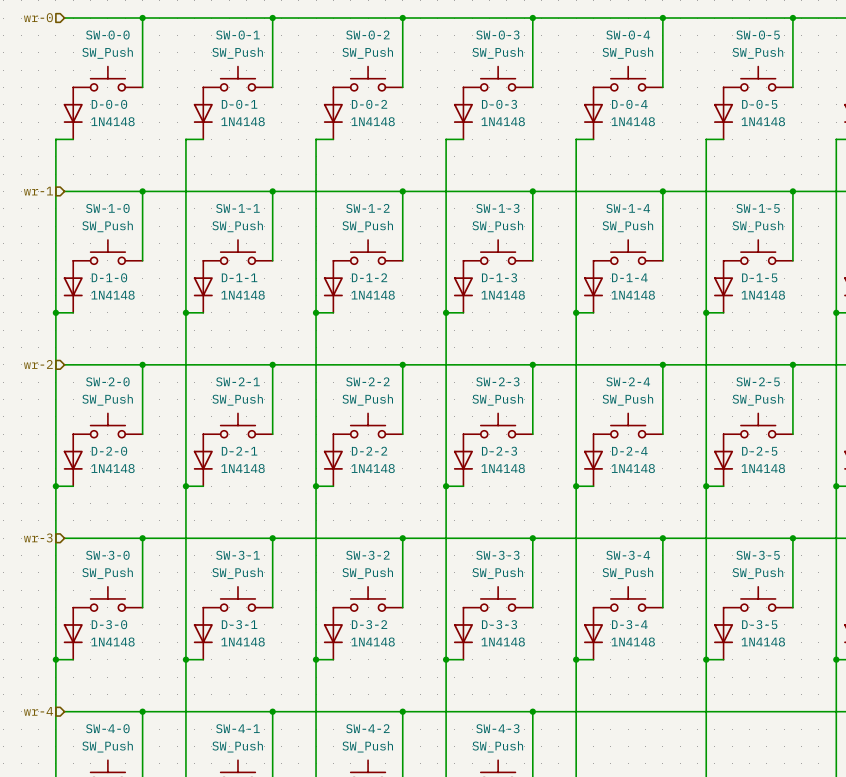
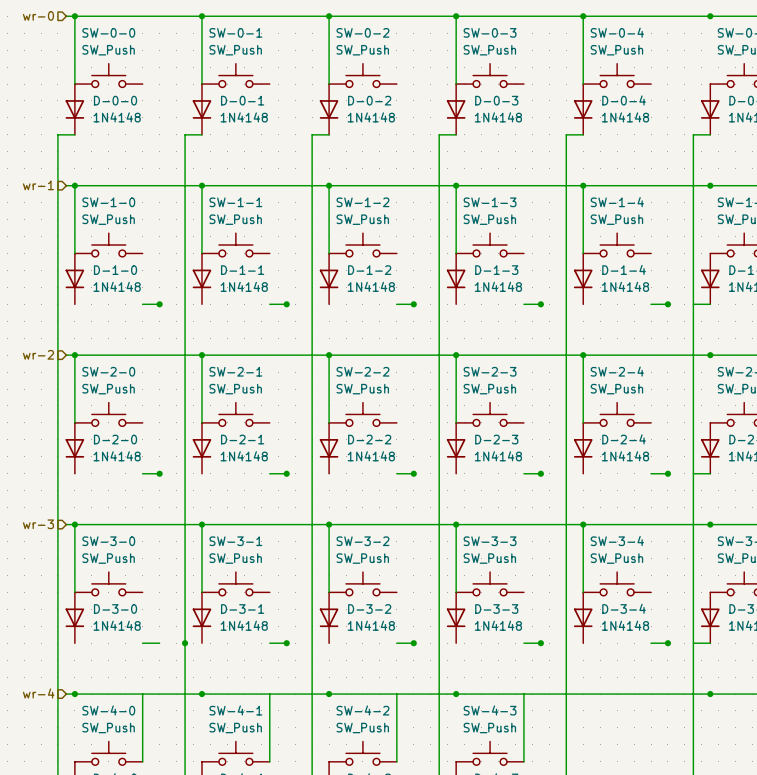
junction: none -> (74, 16)
wire: (142, 18) (142, 87) -> (74, 16) (74, 84)
junction: (142, 18) -> none
junction: none -> (201, 16)
wire: (272, 18) (272, 87) -> (201, 16) (201, 84)
junction: (272, 18) -> none
junction: none -> (329, 16)
wire: (402, 18) (402, 87) -> (329, 16) (329, 84)
junction: (402, 18) -> none
junction: none -> (456, 16)
wire: (532, 18) (532, 87) -> (456, 16) (456, 84)
junction: (532, 18) -> none
junction: none -> (583, 16)
wire: (662, 18) (662, 87) -> (583, 16) (583, 84)
junction: (662, 18) -> none
junction: none -> (710, 16)
junction: none -> (74, 185)
wire: (142, 191) (142, 260) -> (74, 185) (74, 253)
junction: (142, 191) -> none
junction: none -> (201, 185)
wire: (272, 191) (272, 260) -> (201, 185) (201, 253)
junction: (272, 191) -> none
junction: none -> (329, 185)
wire: (402, 191) (402, 260) -> (329, 185) (329, 253)
junction: (402, 191) -> none
junction: none -> (456, 185)
wire: (532, 191) (532, 260) -> (456, 185) (456, 253)
junction: (532, 191) -> none
junction: none -> (583, 185)
wire: (662, 191) (662, 260) -> (583, 185) (583, 253)
junction: (662, 191) -> none
junction: none -> (710, 185)
wire: (55, 312) (73, 312) -> (142, 304) (159, 304)
junction: (55, 312) -> none
wire: (185, 312) (203, 312) -> (269, 304) (286, 304)
junction position: (185, 312) -> (159, 304)
wire: (316, 312) (333, 312) -> (396, 304) (413, 304)
junction position: (316, 312) -> (286, 304)
wire: (446, 312) (463, 312) -> (523, 304) (540, 304)
junction position: (446, 312) -> (413, 304)
wire: (576, 312) (593, 312) -> (651, 304) (667, 304)
junction position: (576, 312) -> (540, 304)
junction position: (706, 312) -> (667, 304)
junction: none -> (74, 355)
wire: (142, 364) (142, 434) -> (74, 355) (74, 422)
junction: (142, 364) -> none
junction: none -> (201, 355)
wire: (272, 364) (272, 434) -> (201, 355) (201, 422)
junction: (272, 364) -> none
junction: none -> (329, 355)
wire: (402, 364) (402, 434) -> (329, 355) (329, 422)
junction: (402, 364) -> none
junction: none -> (456, 355)
wire: (532, 364) (532, 434) -> (456, 355) (456, 422)
junction: (532, 364) -> none
junction: none -> (583, 355)
wire: (662, 364) (662, 434) -> (583, 355) (583, 422)
junction: (662, 364) -> none
junction: none -> (710, 355)
wire: (55, 486) (73, 486) -> (142, 473) (159, 473)
junction: (55, 486) -> none
wire: (185, 486) (203, 486) -> (269, 473) (286, 473)
junction position: (185, 486) -> (159, 473)
wire: (316, 486) (333, 486) -> (396, 473) (413, 473)
junction position: (316, 486) -> (286, 473)
wire: (446, 486) (463, 486) -> (523, 473) (540, 473)
junction position: (446, 486) -> (413, 473)
wire: (576, 486) (593, 486) -> (651, 473) (667, 473)
junction position: (576, 486) -> (540, 473)
junction position: (706, 486) -> (667, 473)
junction: none -> (74, 524)
wire: (142, 538) (142, 607) -> (74, 524) (74, 592)
junction: (142, 538) -> none
junction: none -> (201, 524)
wire: (272, 538) (272, 607) -> (201, 524) (201, 592)
junction: (272, 538) -> none
junction: none -> (329, 524)
wire: (402, 538) (402, 607) -> (329, 524) (329, 592)
junction: (402, 538) -> none
junction: none -> (456, 524)
wire: (532, 538) (532, 607) -> (456, 524) (456, 592)
junction: (532, 538) -> none
junction: none -> (583, 524)
wire: (662, 538) (662, 607) -> (583, 524) (583, 592)
junction: (662, 538) -> none
junction: none -> (710, 524)
wire: (55, 659) (73, 659) -> (142, 643) (159, 643)
junction: (55, 659) -> none
wire: (185, 659) (203, 659) -> (269, 643) (286, 643)
wire: (316, 659) (333, 659) -> (396, 643) (413, 643)
junction position: (316, 659) -> (286, 643)
wire: (446, 659) (463, 659) -> (523, 643) (540, 643)
junction position: (446, 659) -> (413, 643)
wire: (576, 659) (593, 659) -> (651, 643) (667, 643)
junction position: (576, 659) -> (540, 643)
junction position: (706, 659) -> (667, 643)
junction: none -> (74, 694)
junction: (142, 711) -> none
junction: none -> (201, 694)
junction: (272, 711) -> none
junction: none -> (329, 694)
junction: (402, 711) -> none
junction: none -> (456, 694)
junction: (532, 711) -> none
junction: none -> (710, 694)

